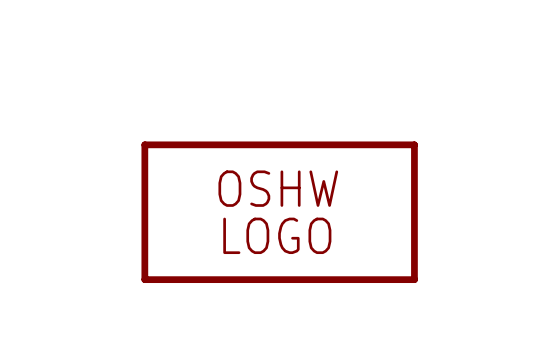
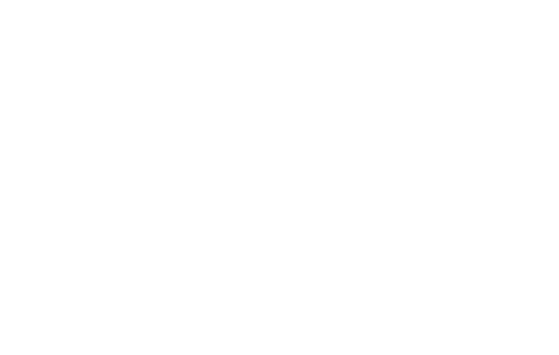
part: (279, 212) -> none

